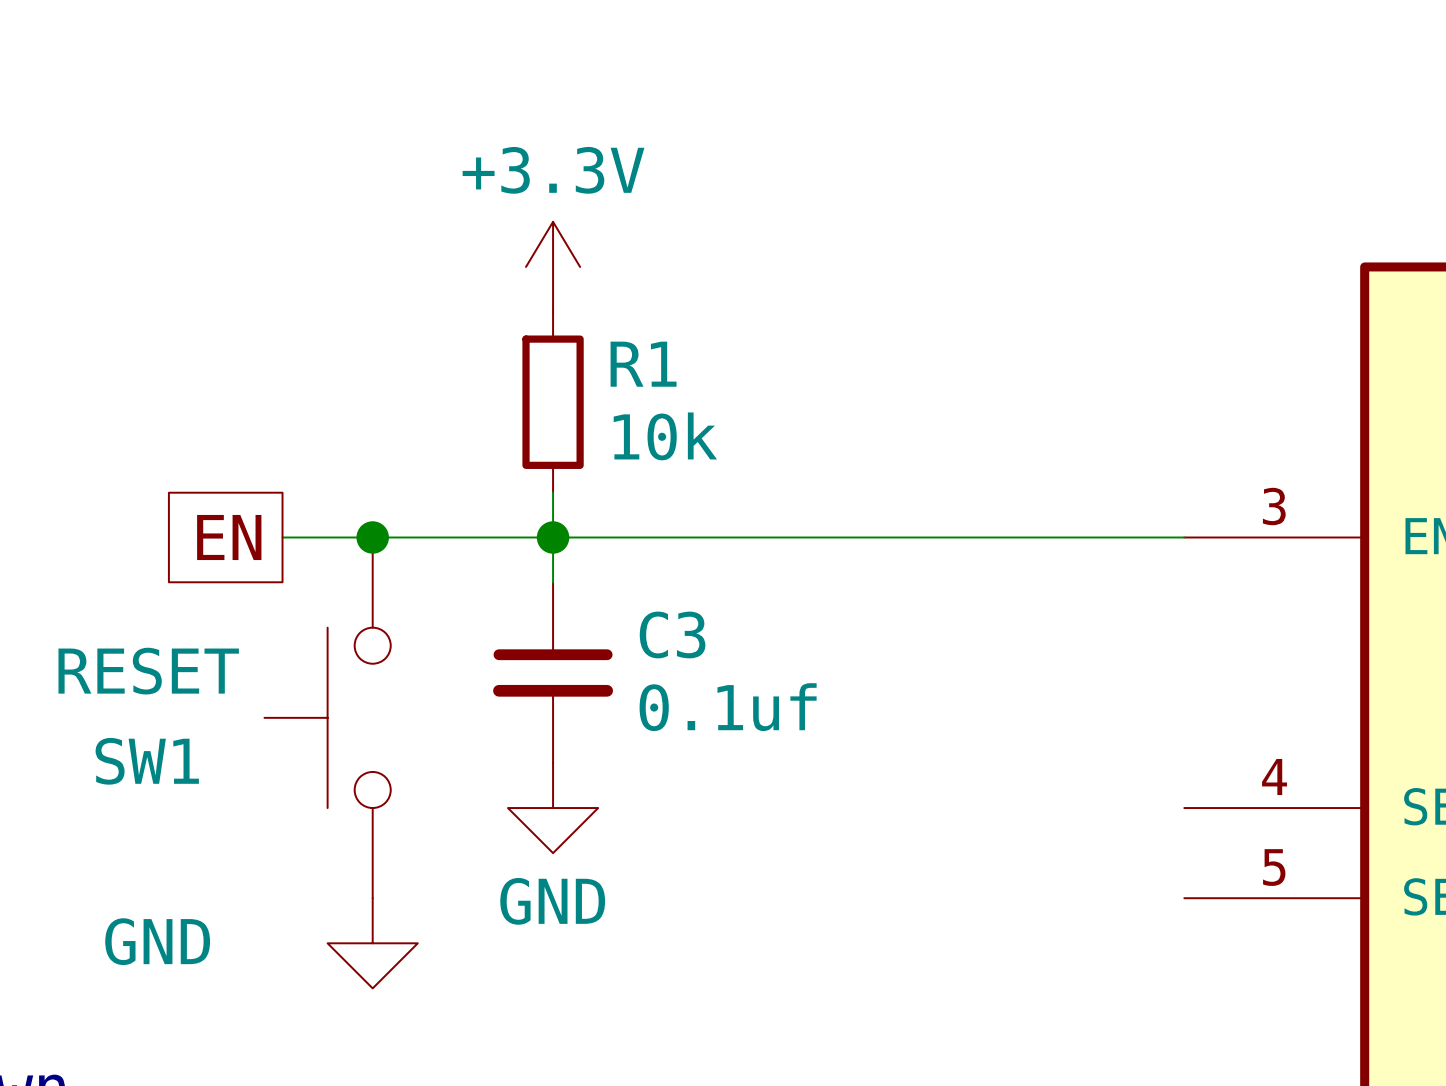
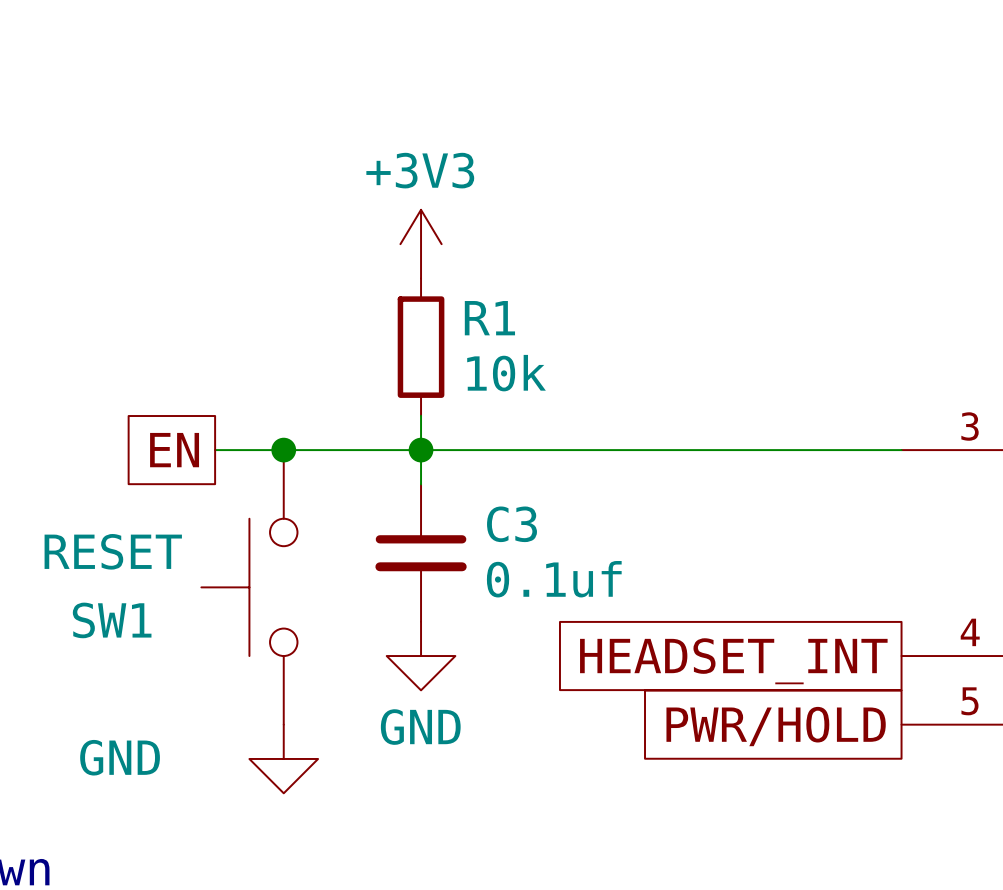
power symbol: +3.3V (553, 266) -> +3V3 (421, 244)
global label: none -> HEADSET_INT (733, 661)
global label: none -> PWR/HOLD (776, 726)

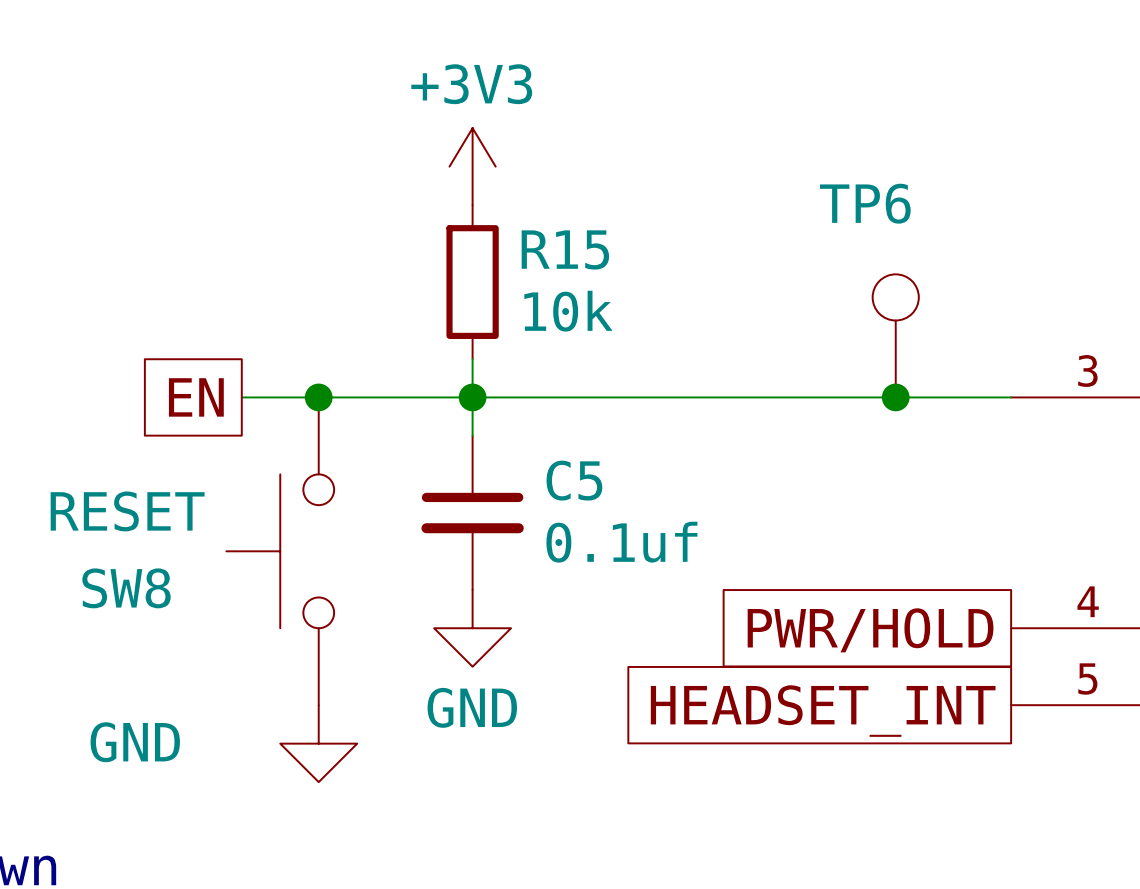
R1 name: R1 (489, 318) -> R15 (565, 249)
TP6: none -> (895, 335)
junction: none -> (895, 397)
C3 name: C3 (512, 524) -> C5 (574, 480)
SW1 name: SW1 (112, 620) -> SW8 (126, 588)
global label: HEADSET_INT (733, 661) -> PWR/HOLD (870, 630)
global label: PWR/HOLD (776, 726) -> HEADSET_INT (823, 711)

